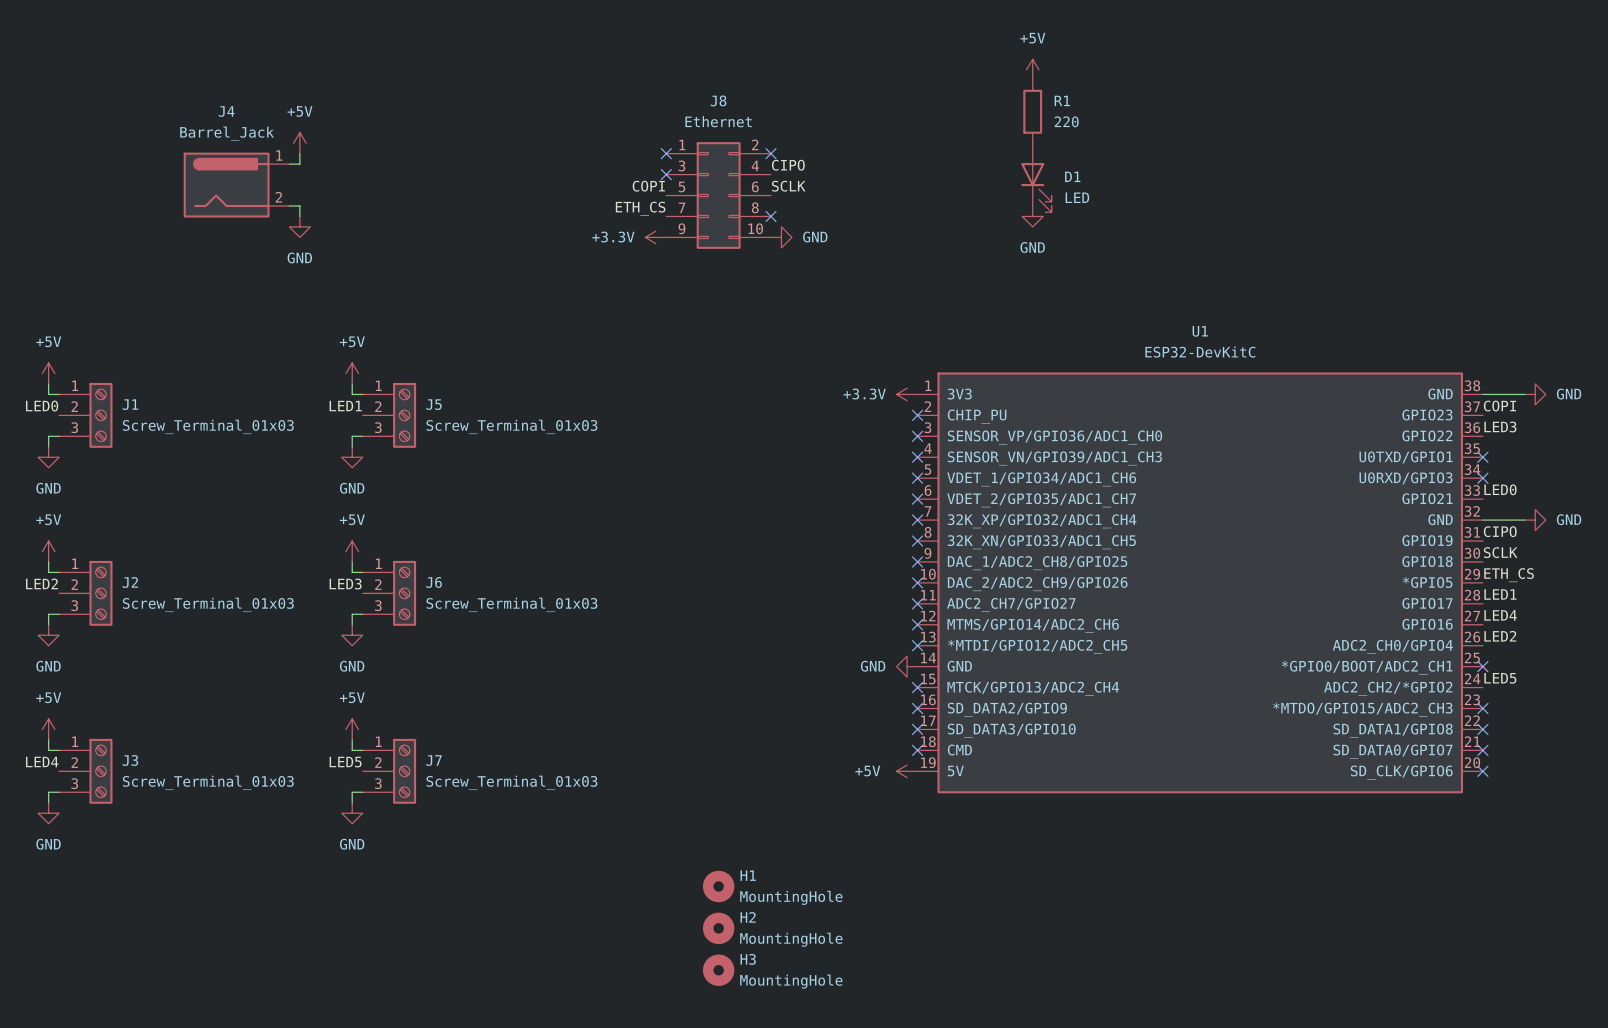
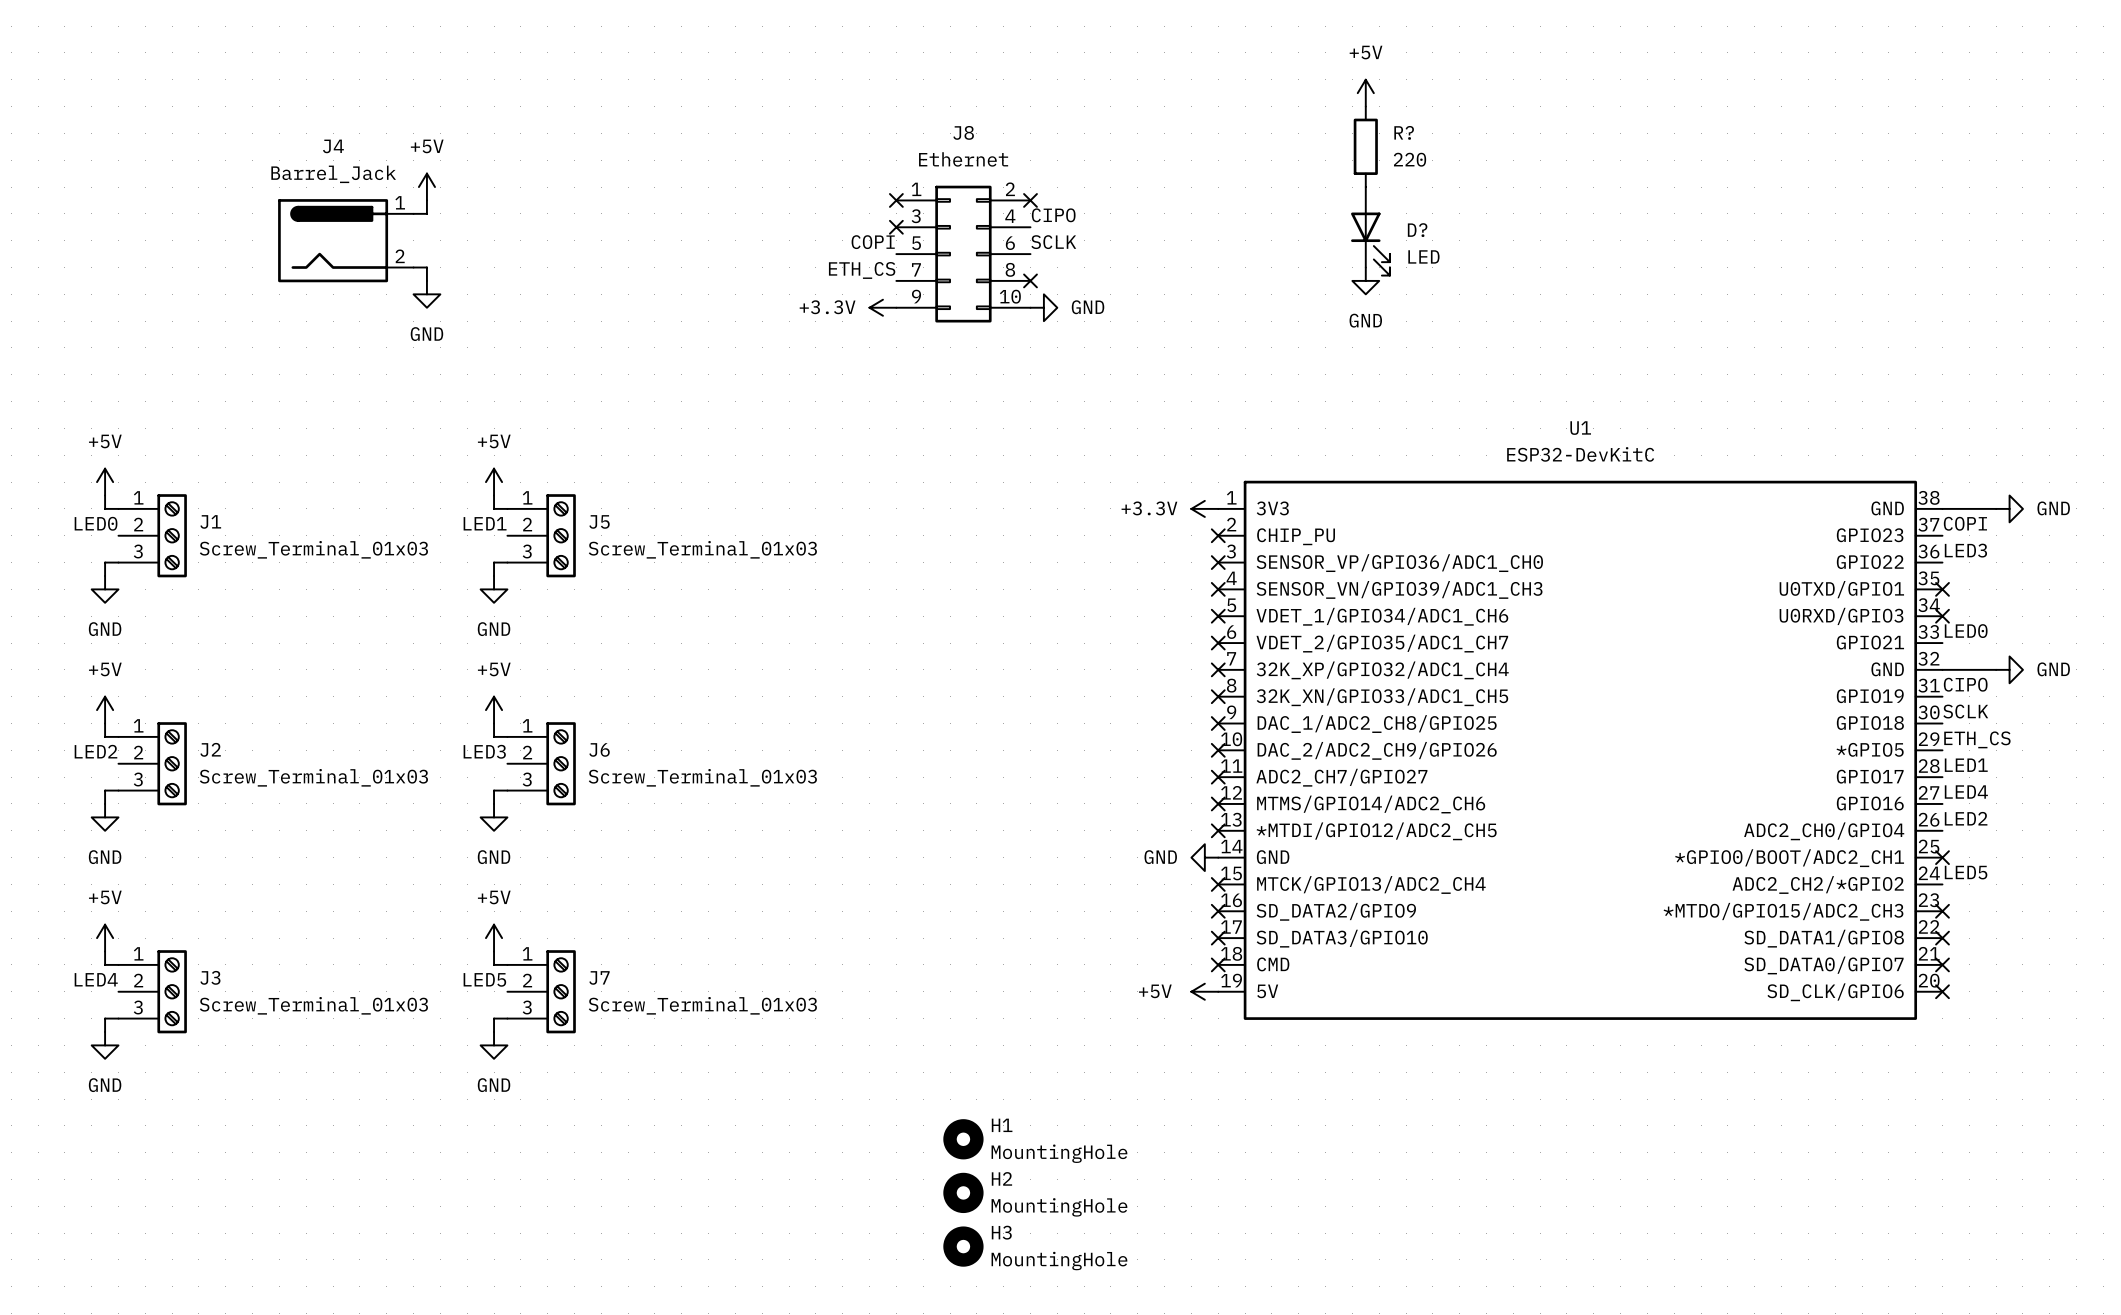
R1 name: R1 (1062, 100) -> R? (1404, 132)
D1 name: D1 (1072, 176) -> D? (1417, 230)

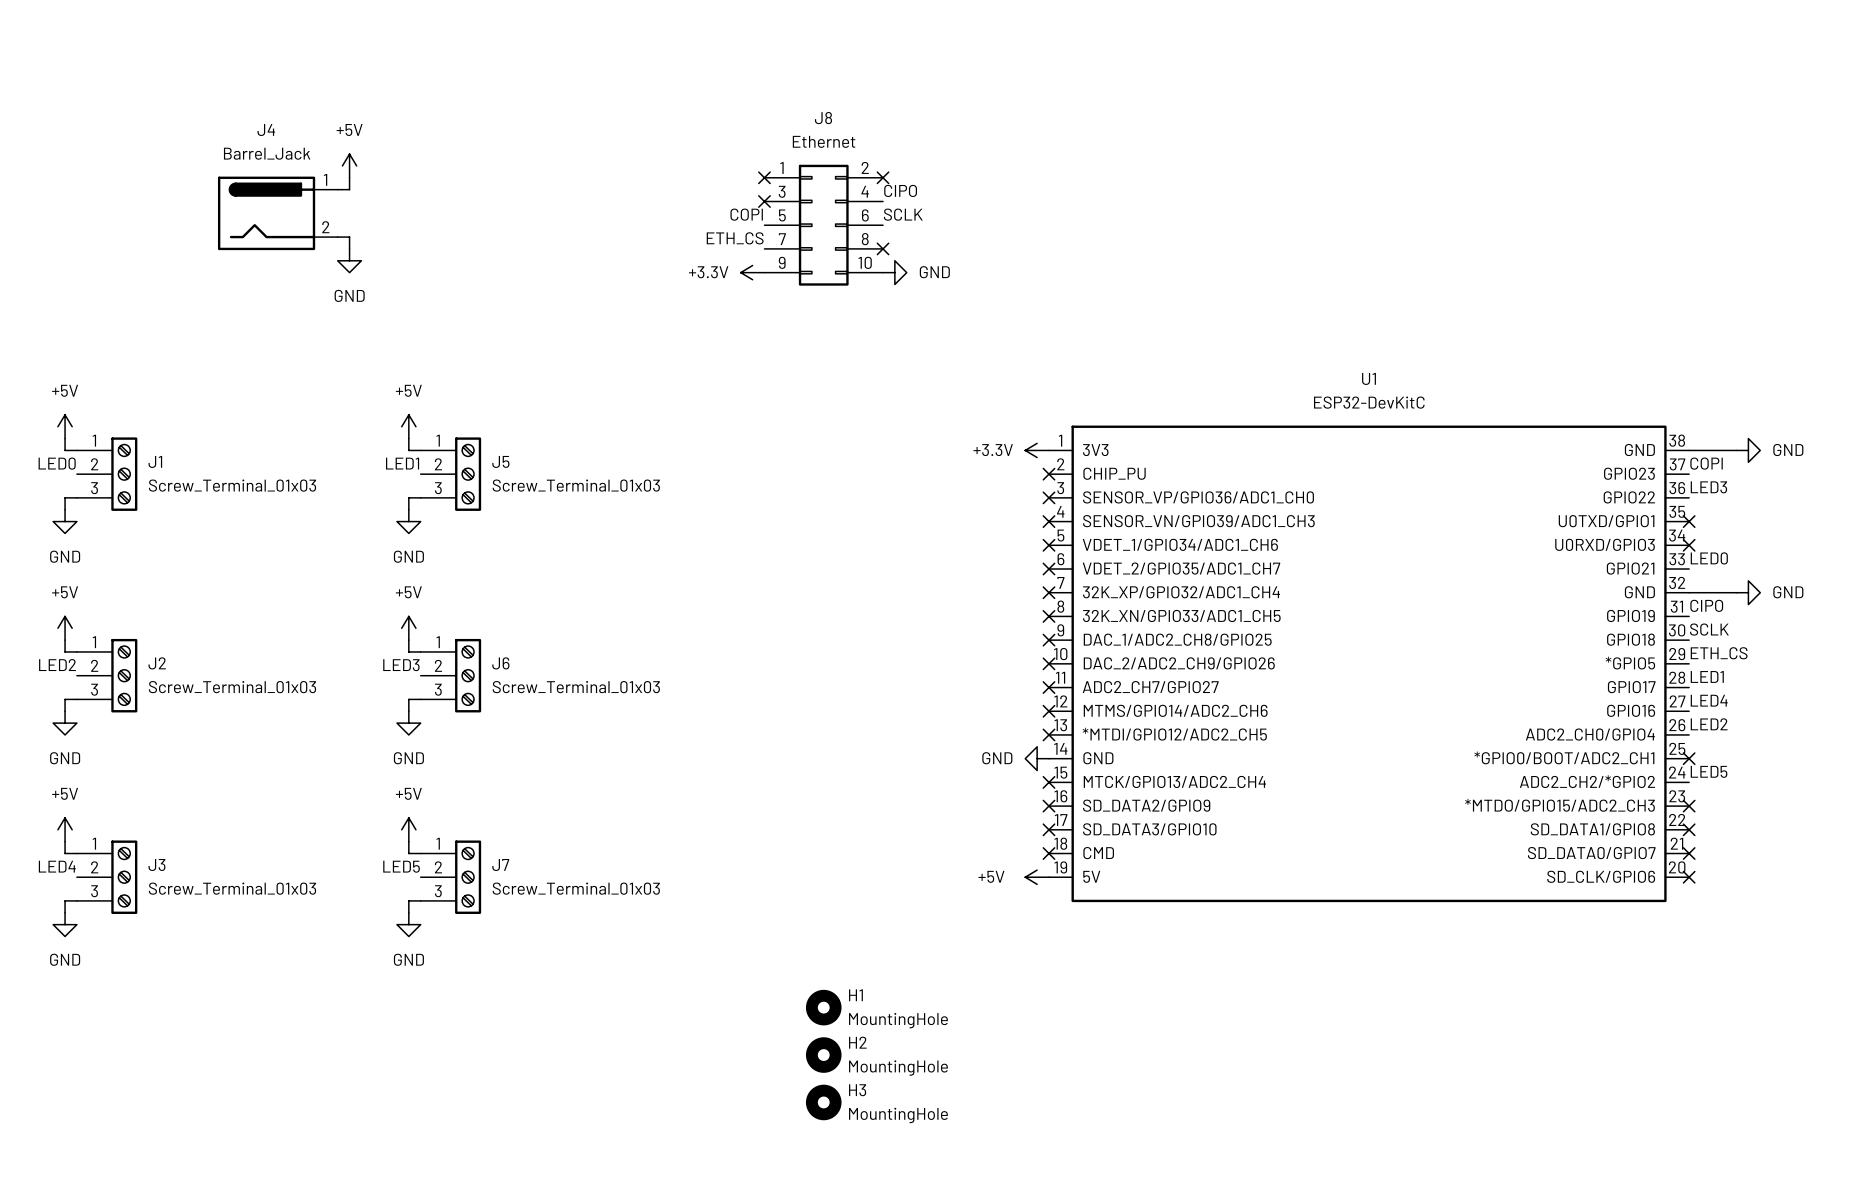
power symbol: +5V (1365, 93) -> none
R?: 220 (1365, 146) -> none
D?: LED (1370, 231) -> none
power symbol: GND (1365, 280) -> none

